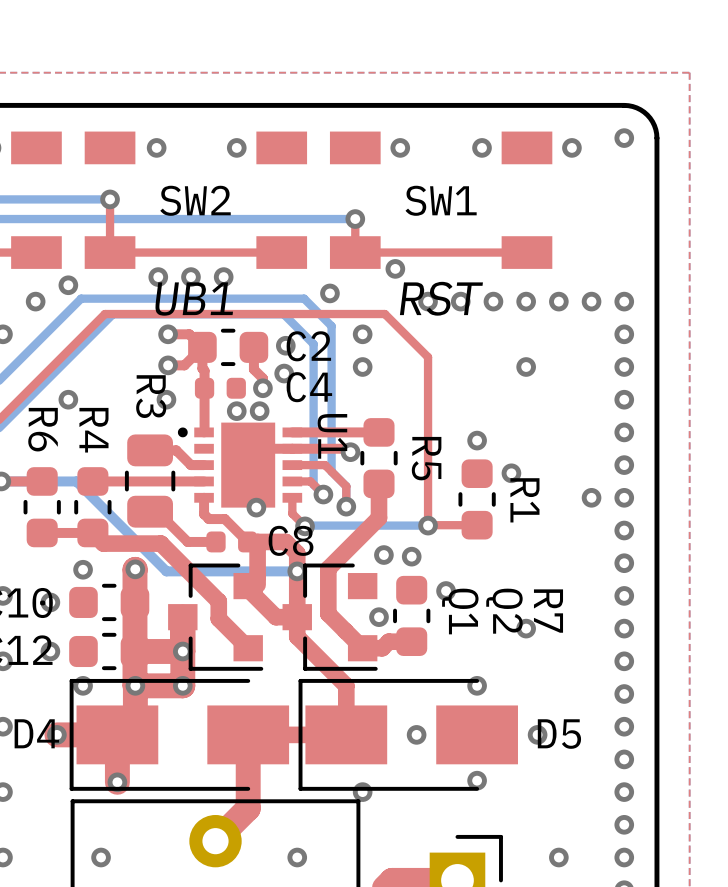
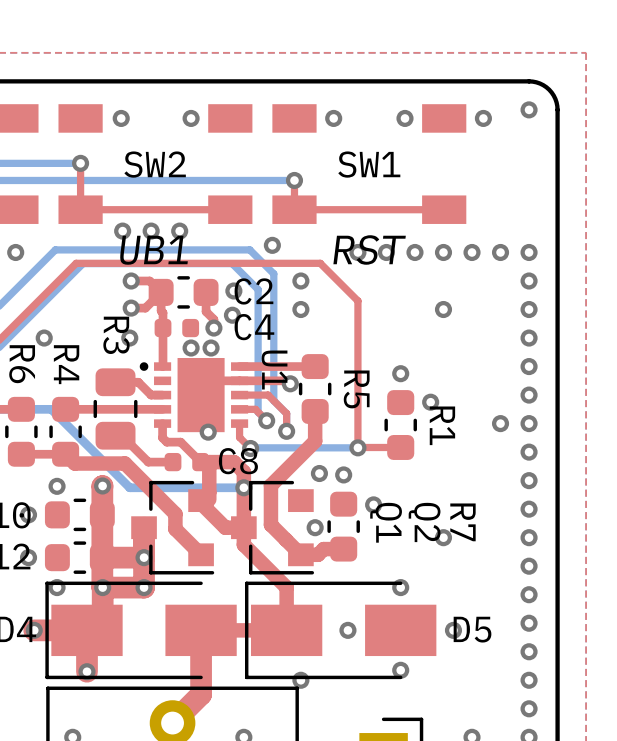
via: (395, 268) -> none
via: (68, 285) -> none

